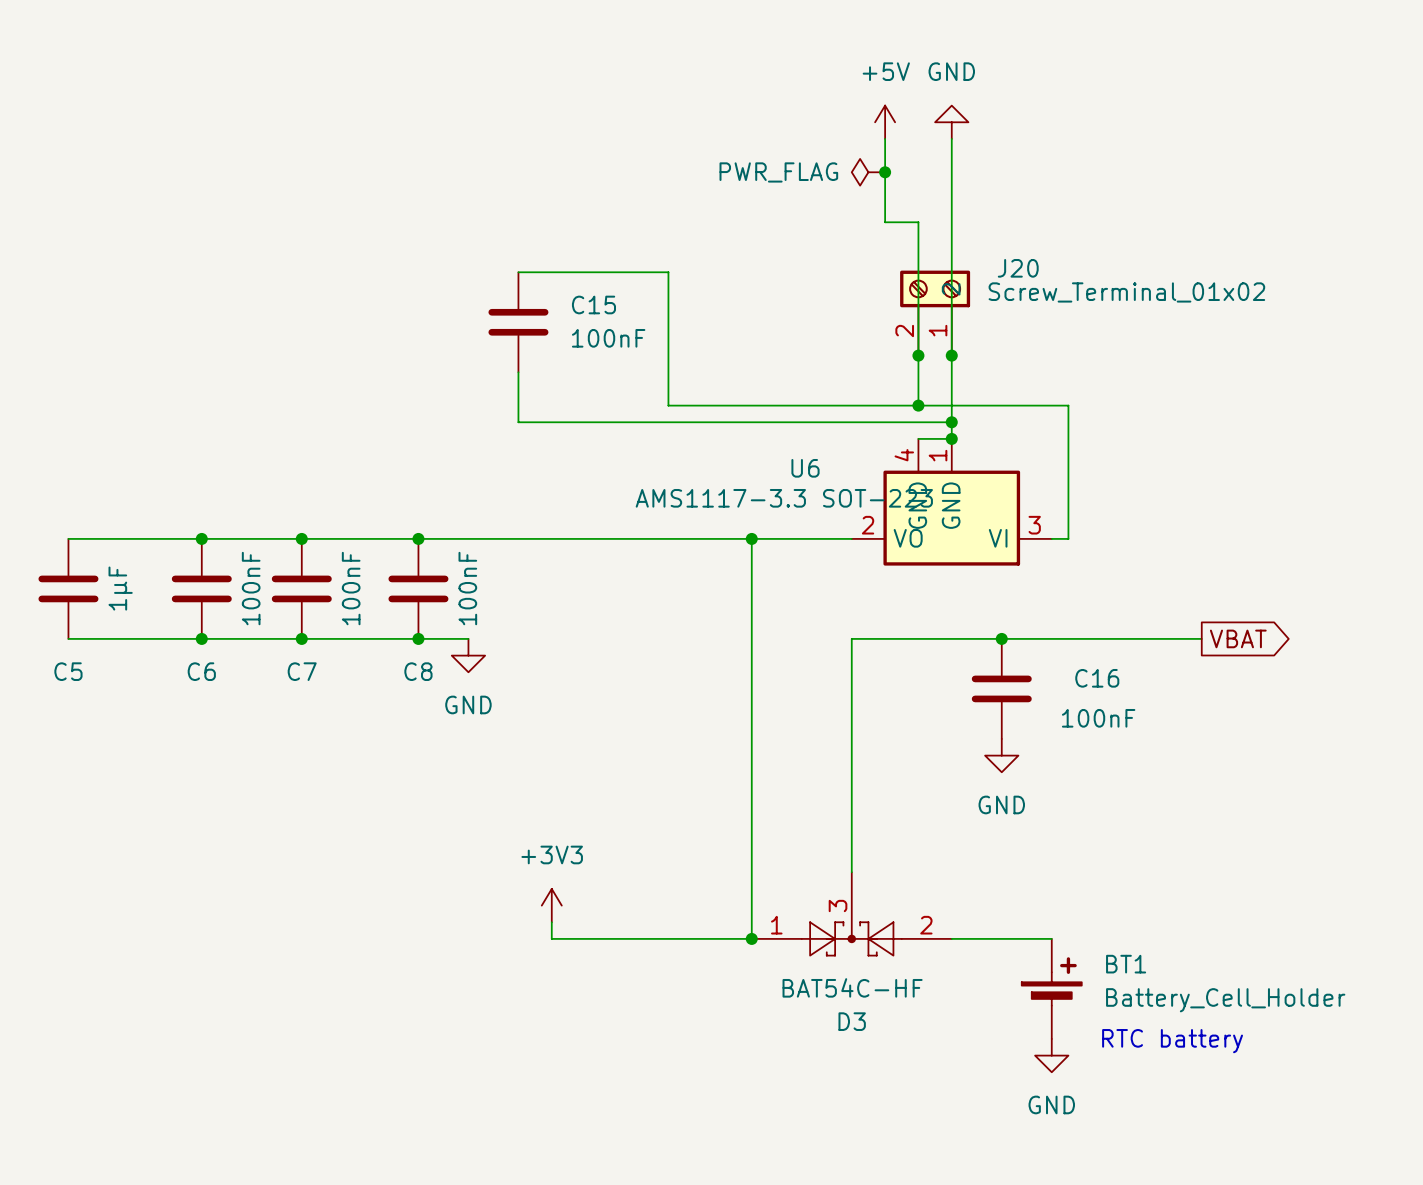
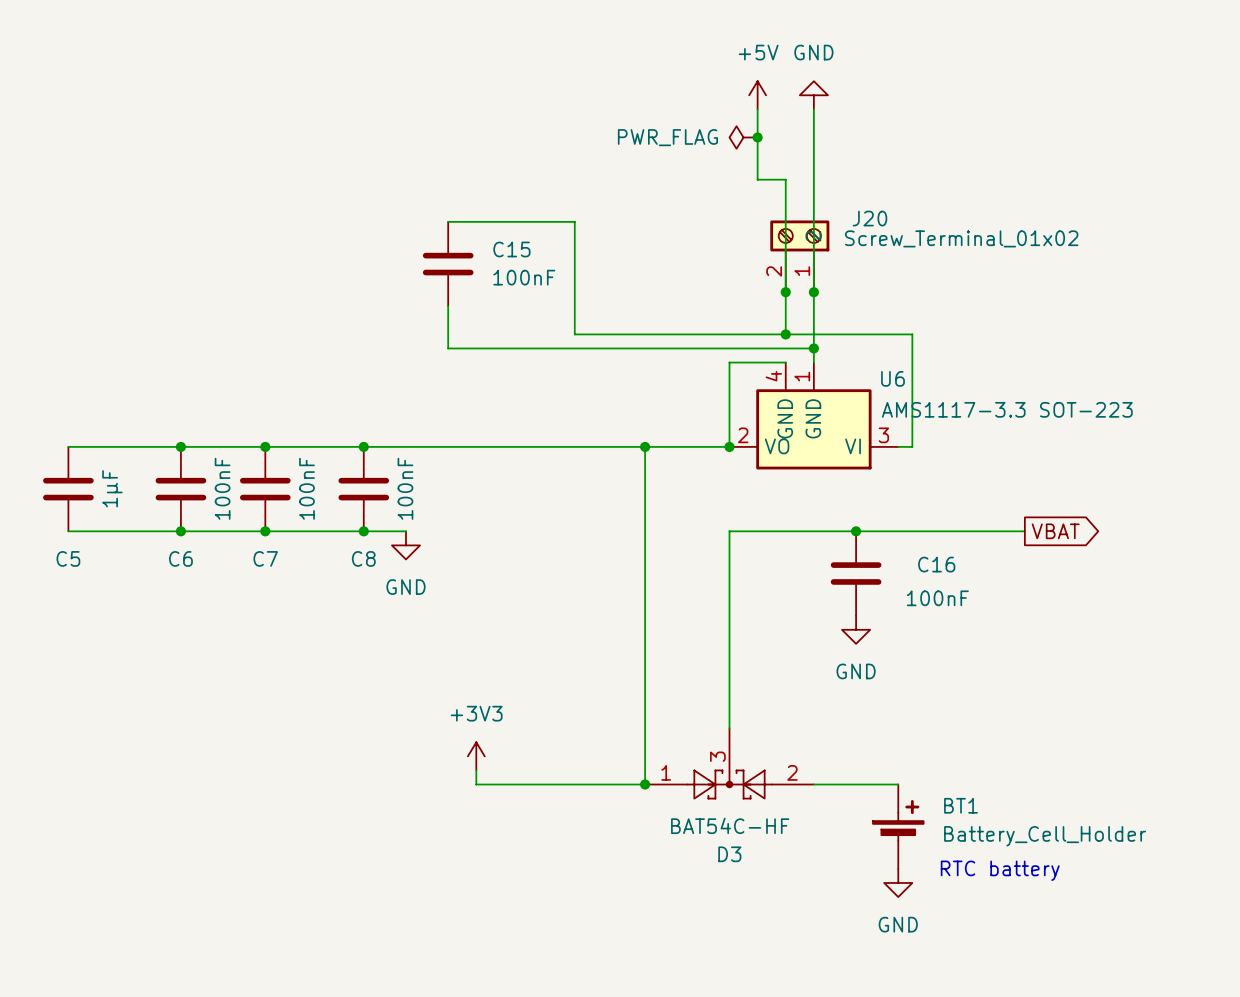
wire: (918, 438) (951, 438) -> (785, 362) (729, 362) (729, 446)
junction: (951, 438) -> none
U6 name position: U6 (805, 468) -> U6 (892, 378)
U6 value position: AMS1117-3.3 SOT-223 (784, 498) -> AMS1117-3.3 SOT-223 (1007, 409)
junction: none -> (729, 446)

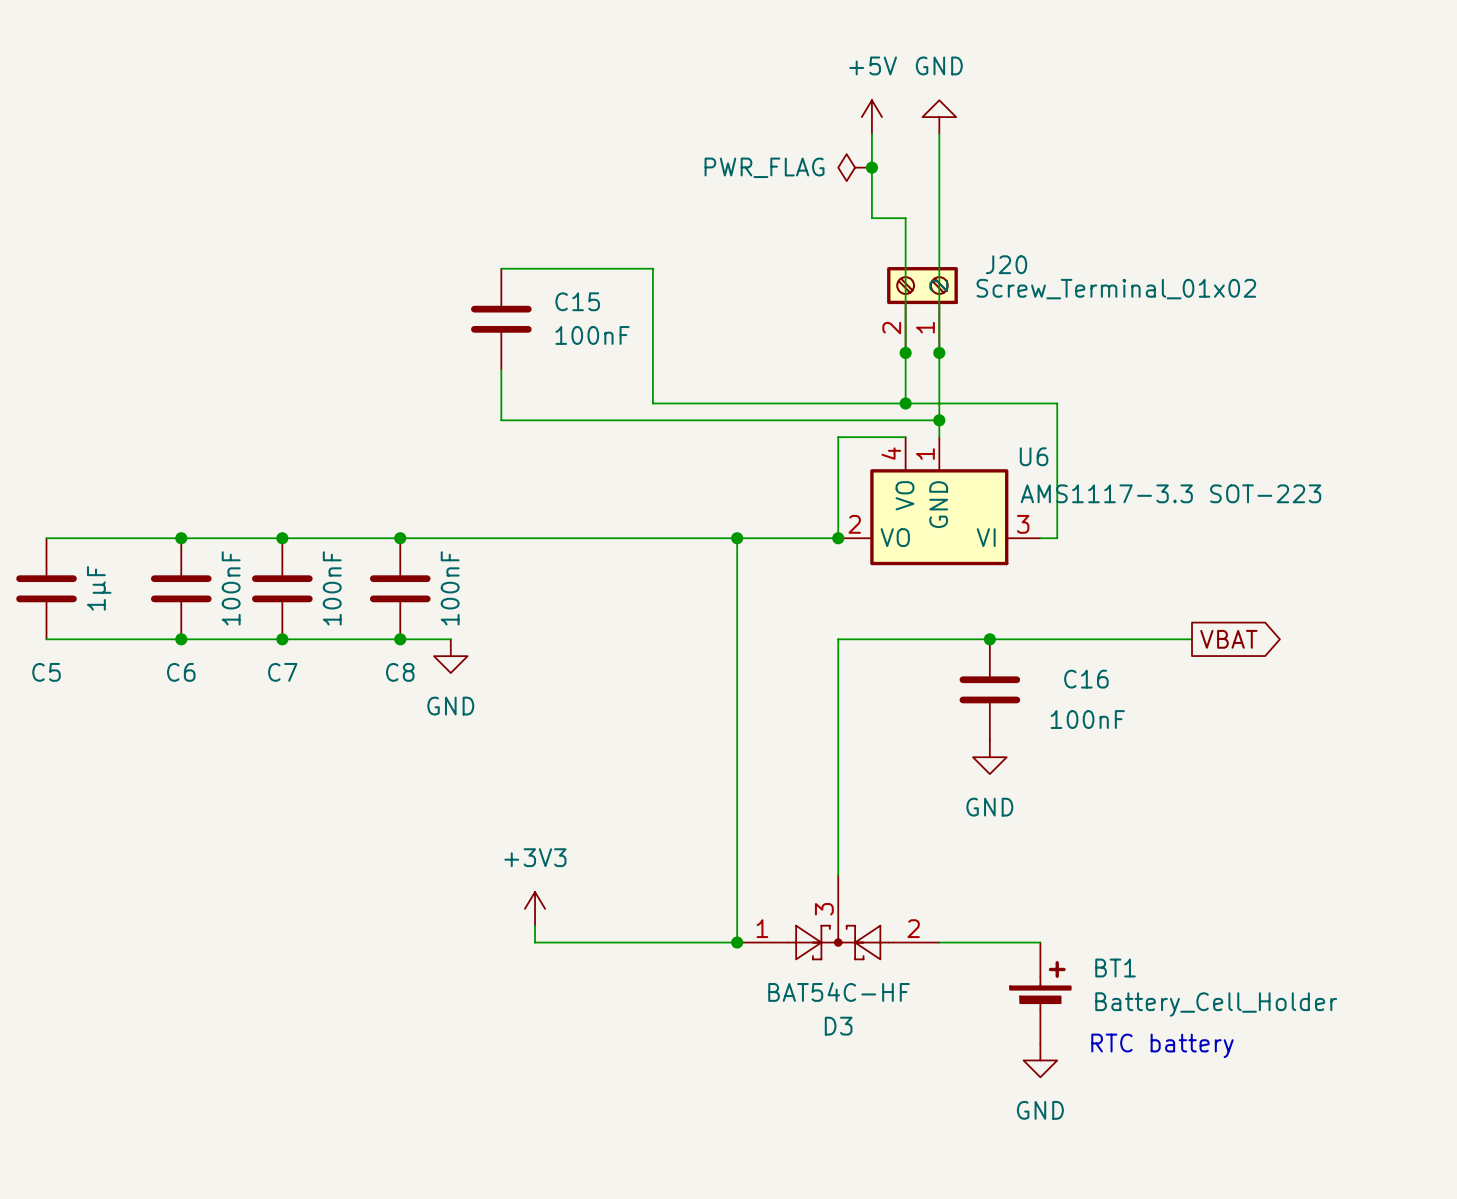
U6 pin name: GND (785, 418) -> VO (904, 495)

